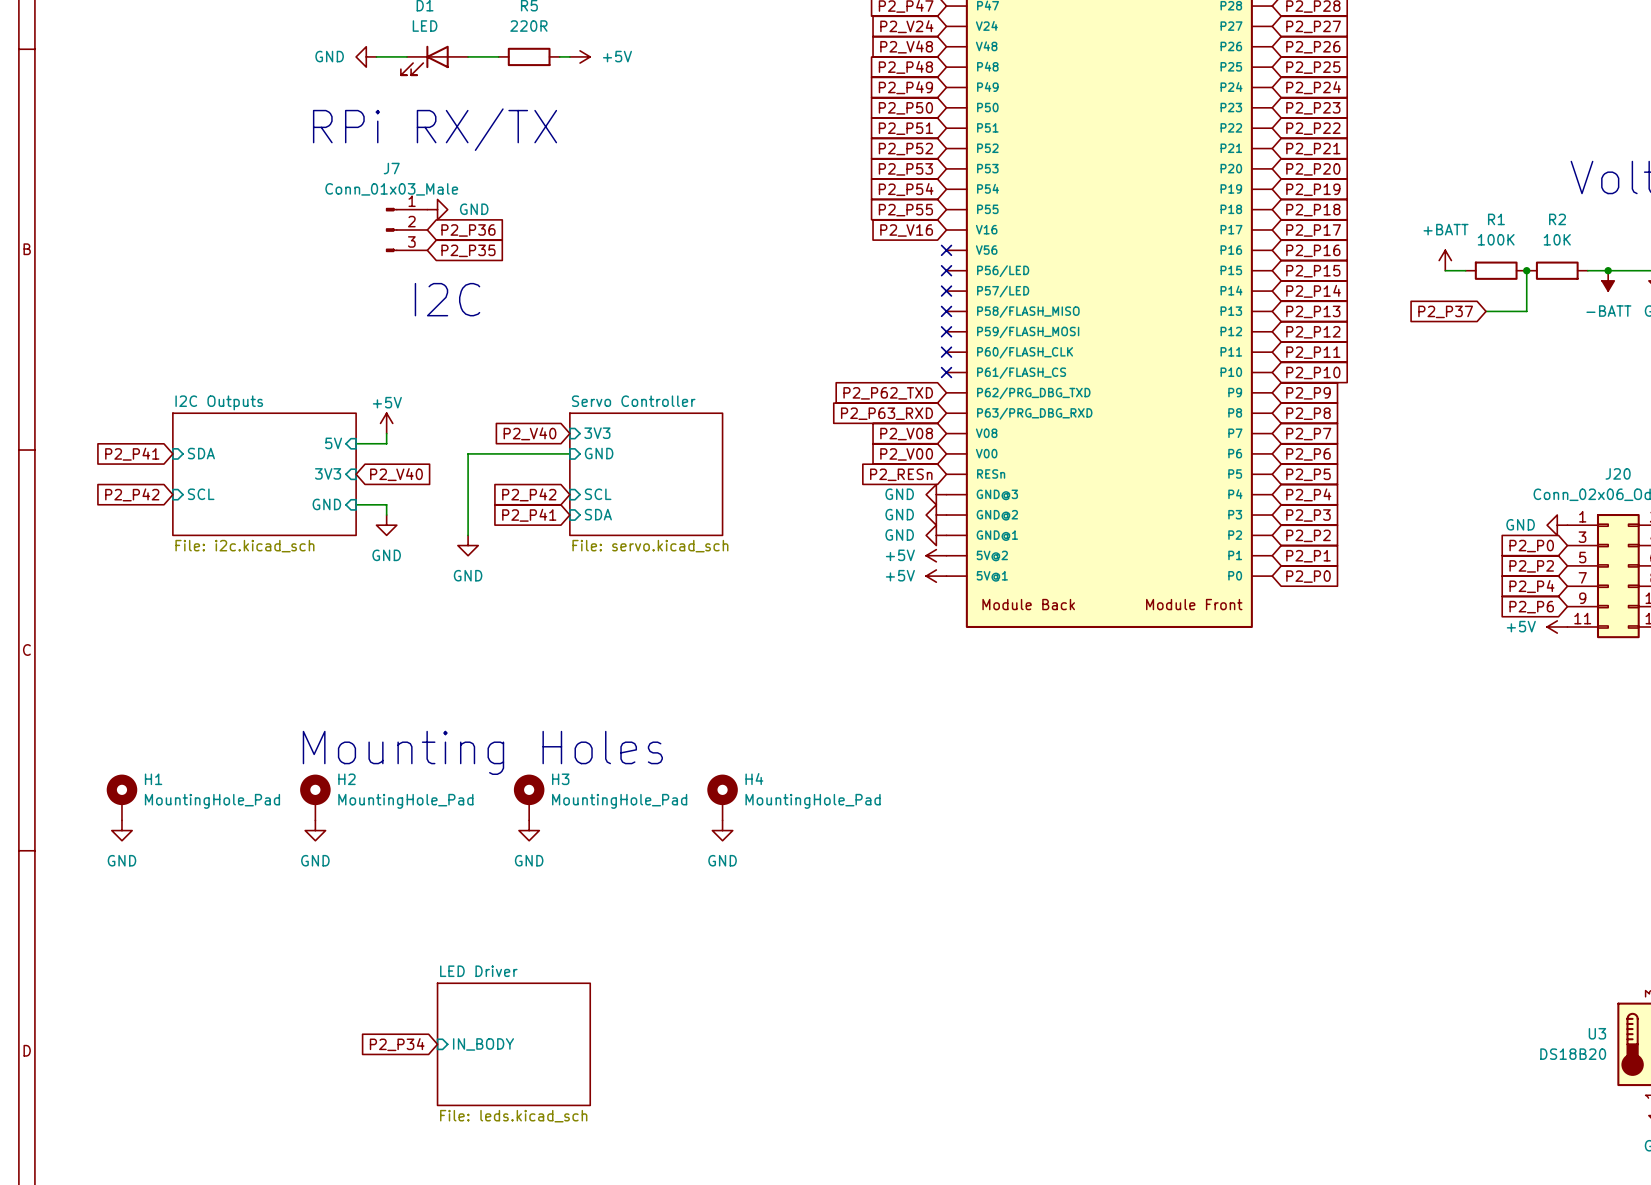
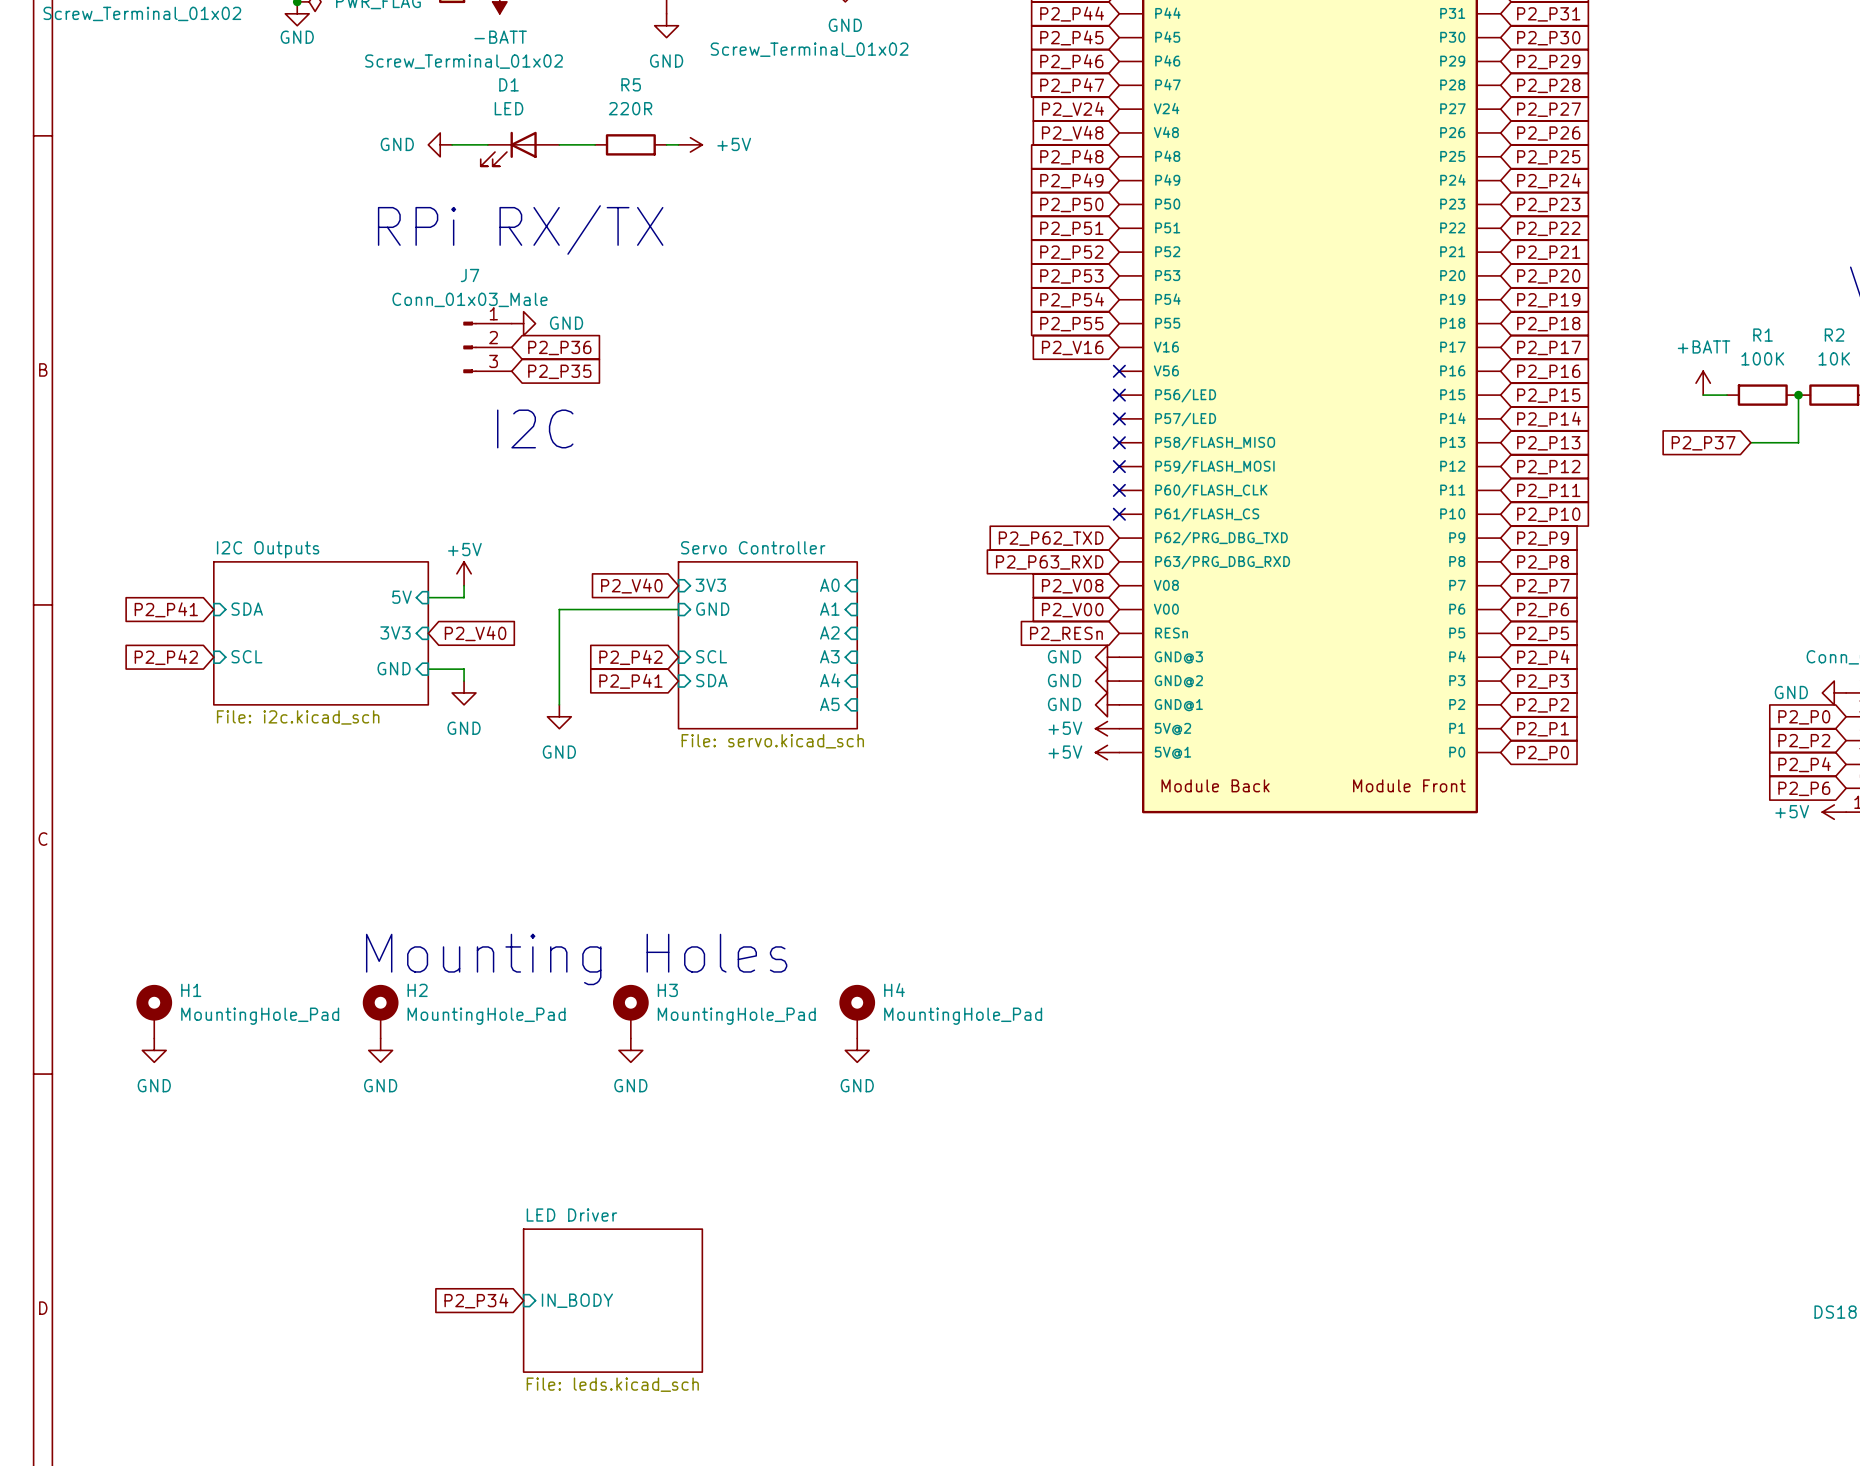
sheet pin: none -> A0 (829, 585)
sheet pin: none -> A1 (829, 609)
sheet pin: none -> A2 (829, 632)
sheet Servo Controller: File: servo.kicad_sch (646, 474) -> none
sheet Servo Controller: none -> File: servo.kicad_sch (767, 645)
sheet pin: none -> A3 (829, 656)
sheet pin: none -> A4 (830, 680)
sheet pin: none -> A5 (829, 704)

